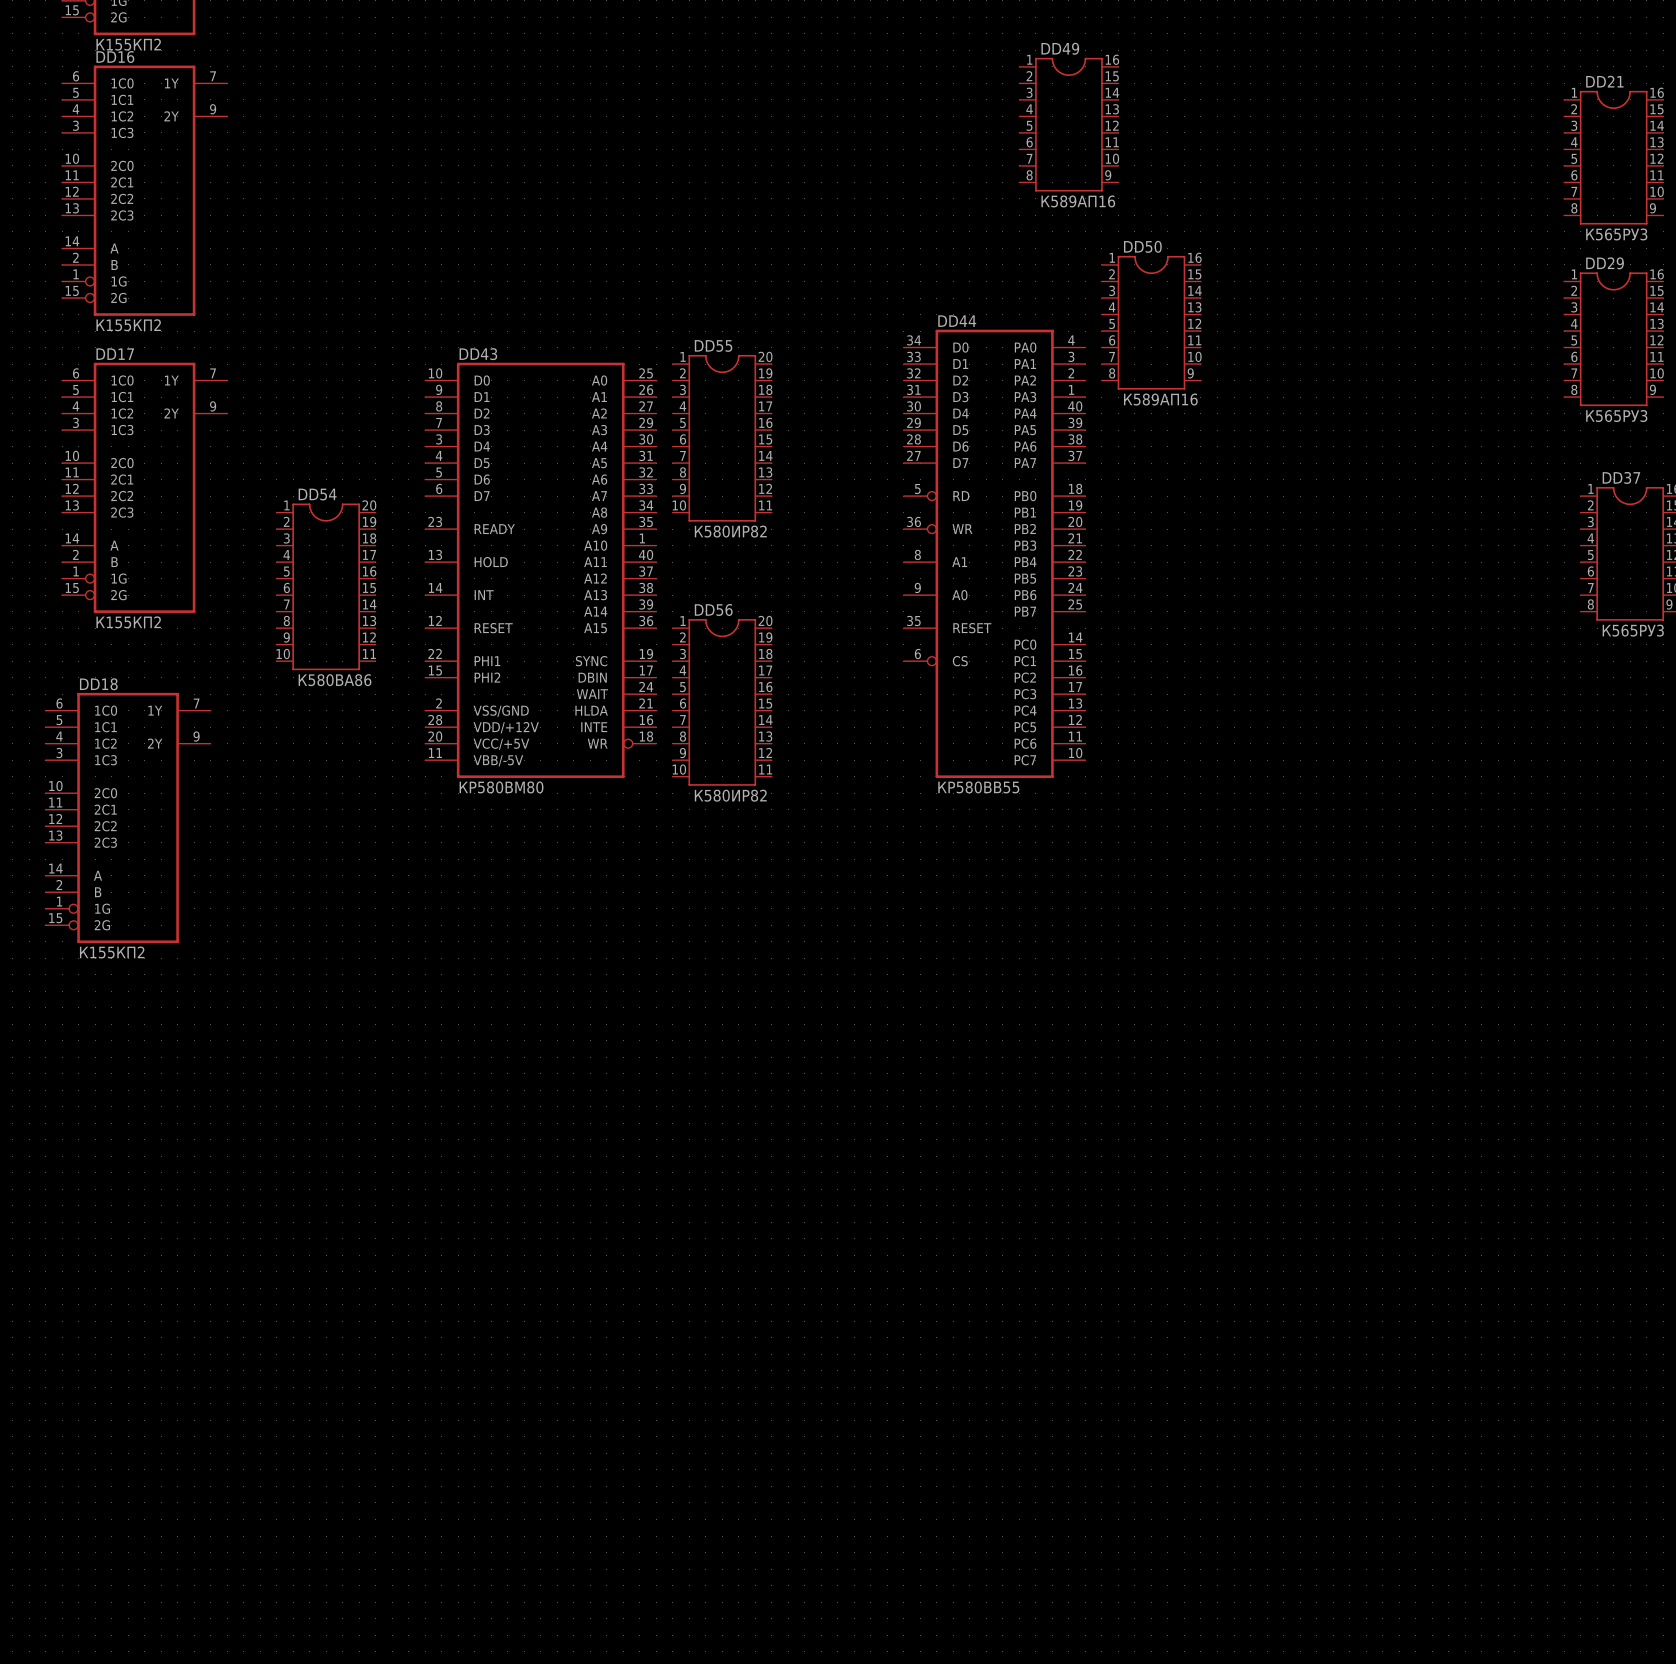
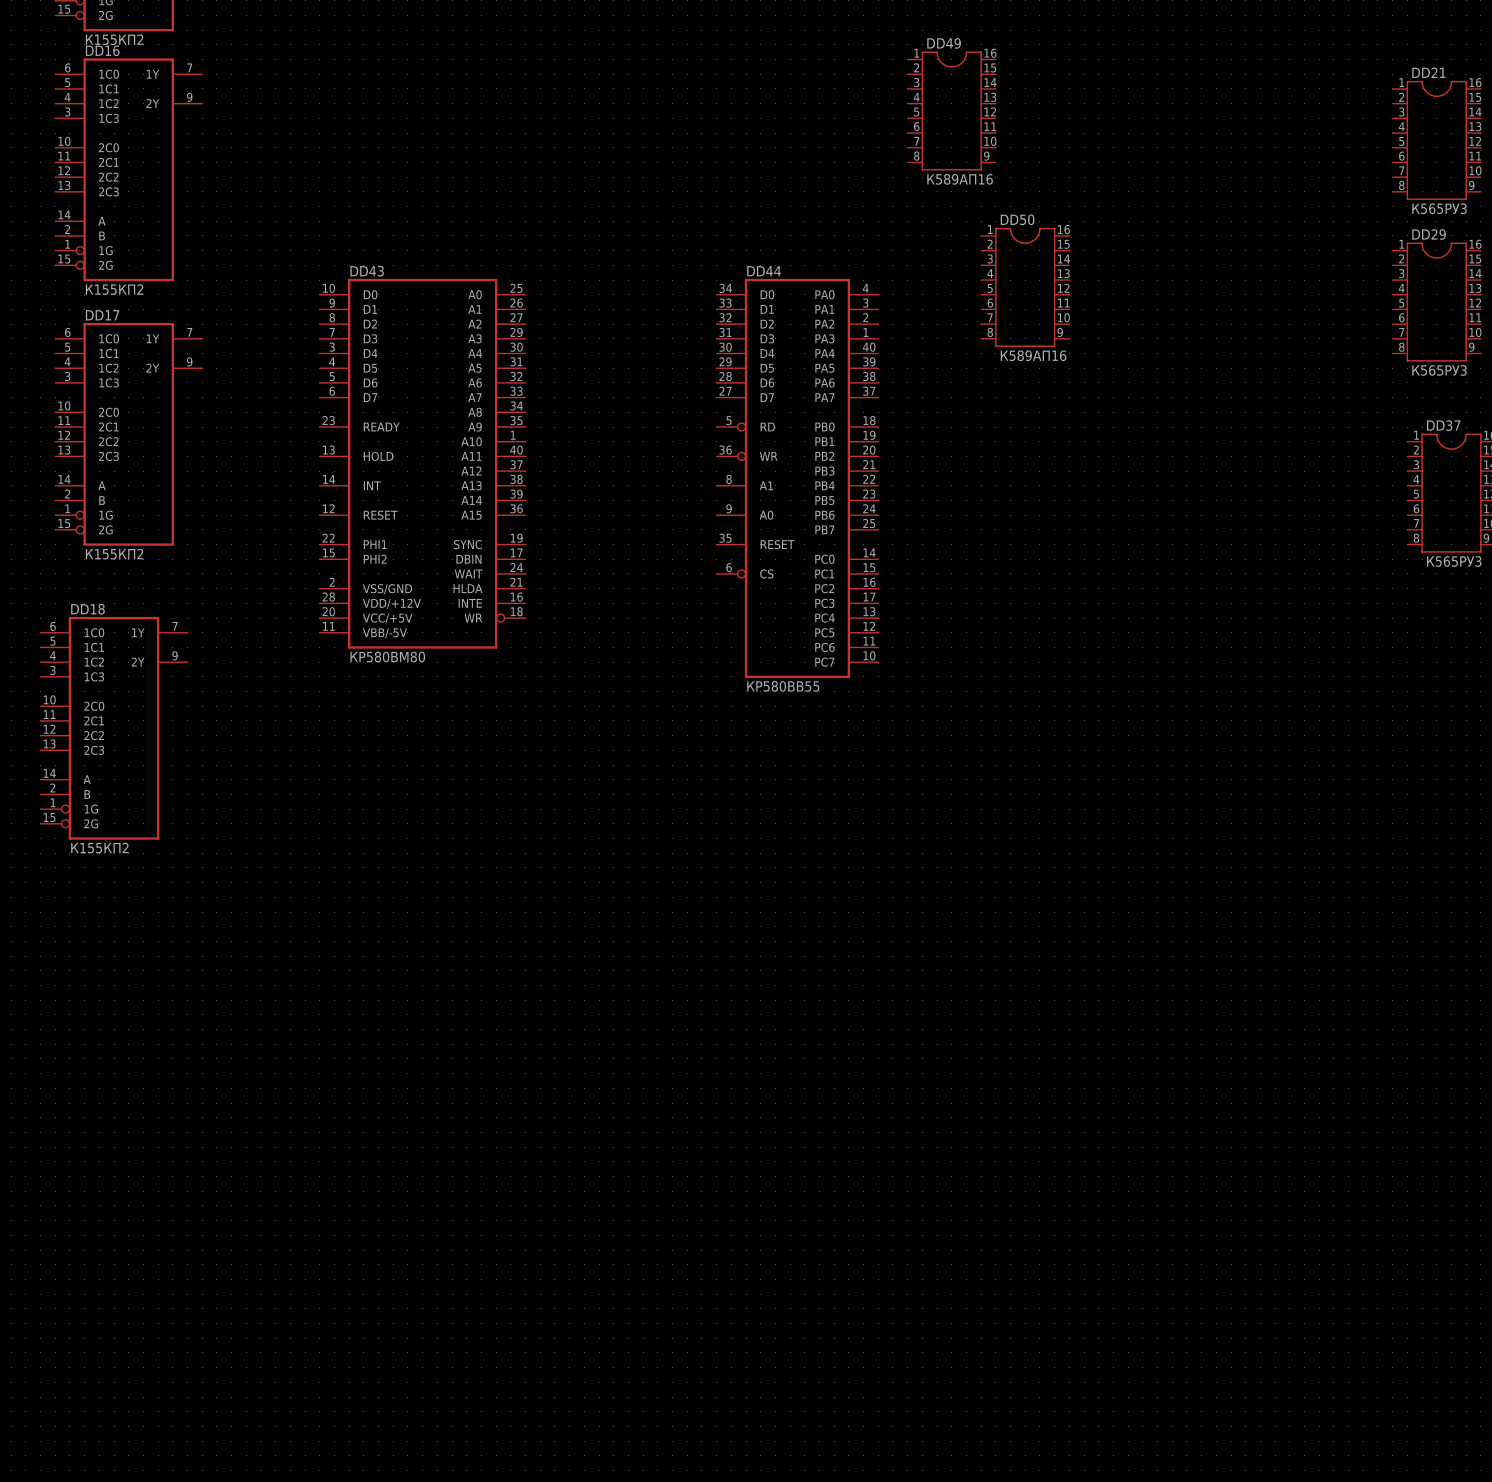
DD55: К580ИР82 (722, 438) -> none
DD44 position: (994, 553) -> (797, 478)
DD43 position: (540, 570) -> (422, 463)
DD54: К580ВА86 (326, 586) -> none
DD56: К580ИР82 (722, 702) -> none

